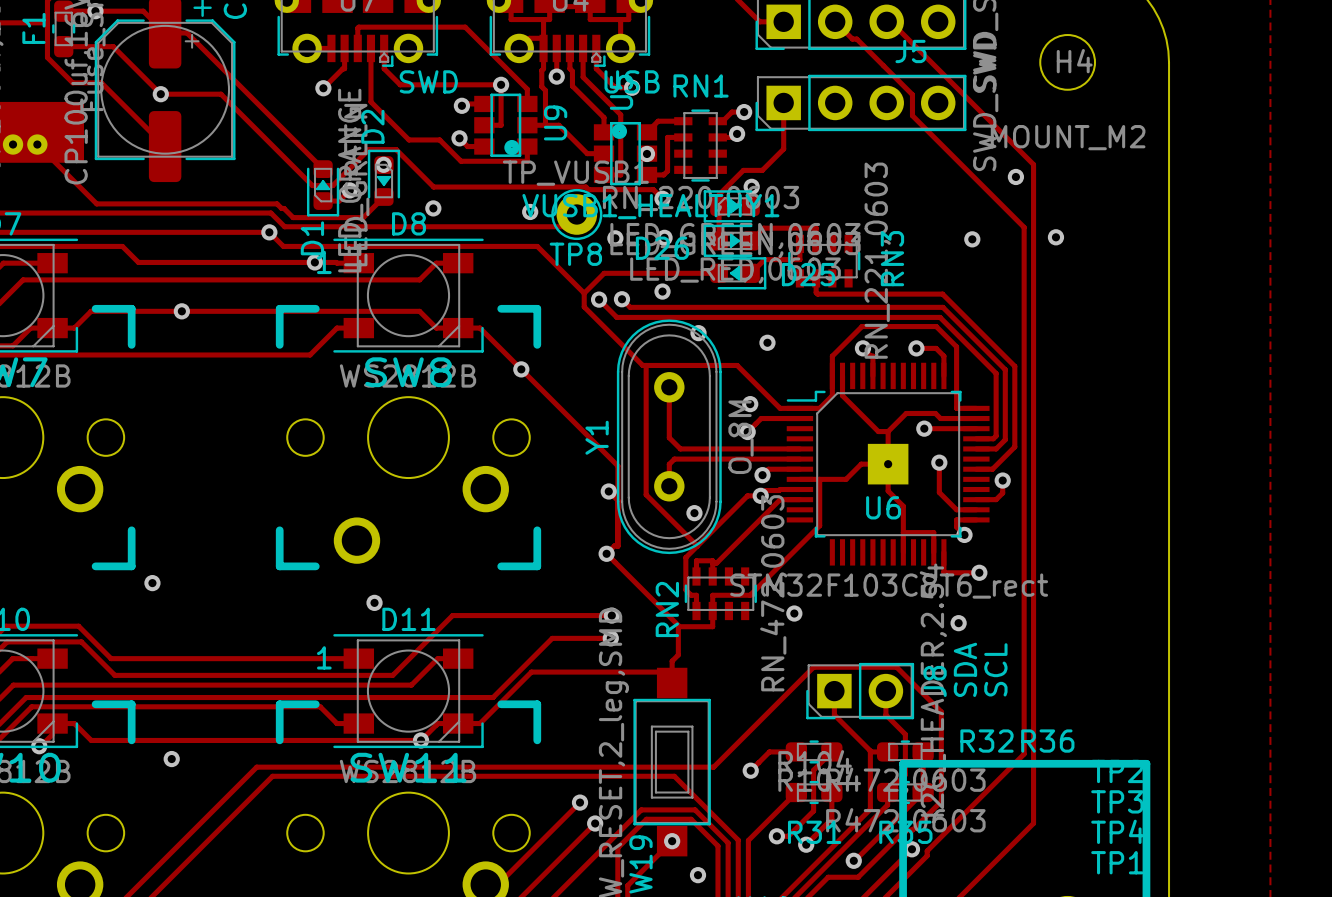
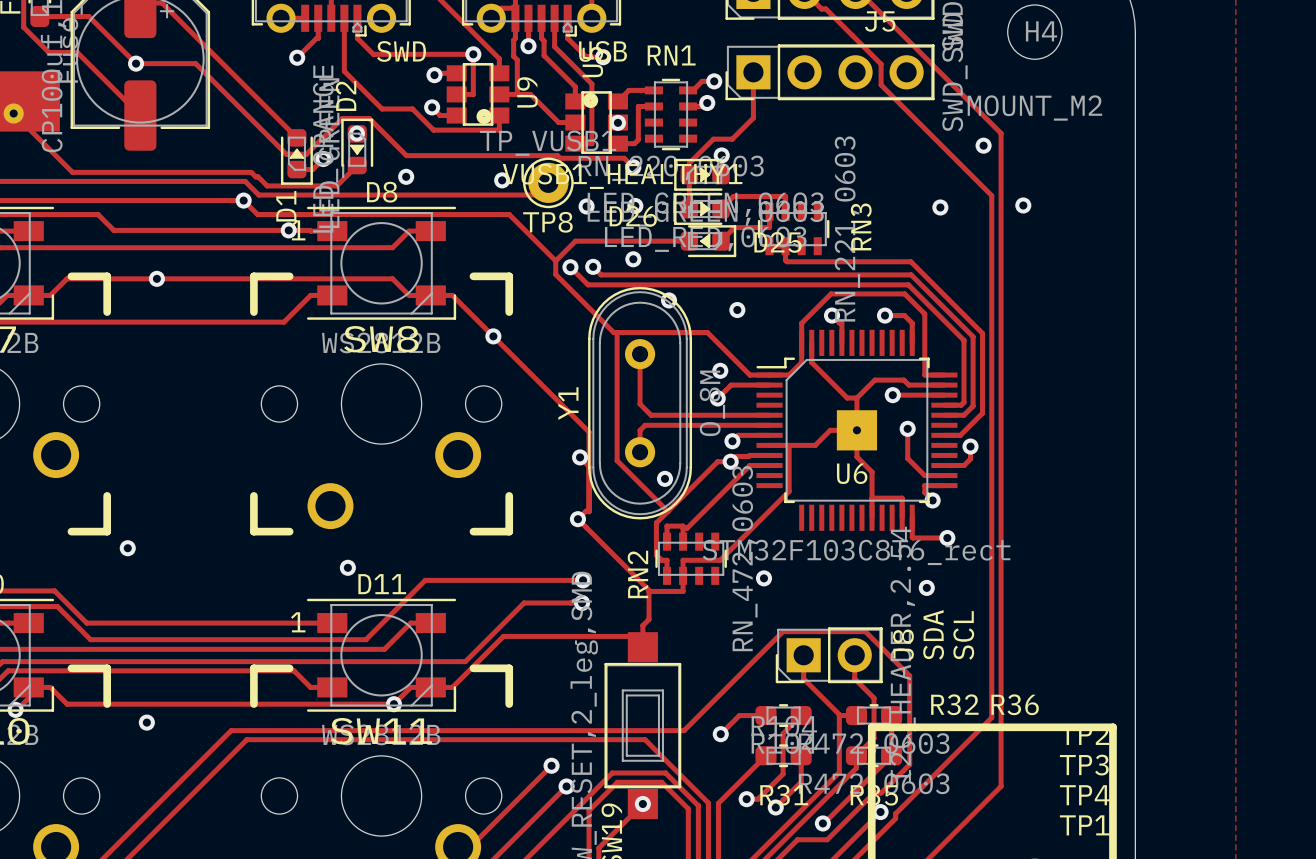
via: (698, 875) -> none

